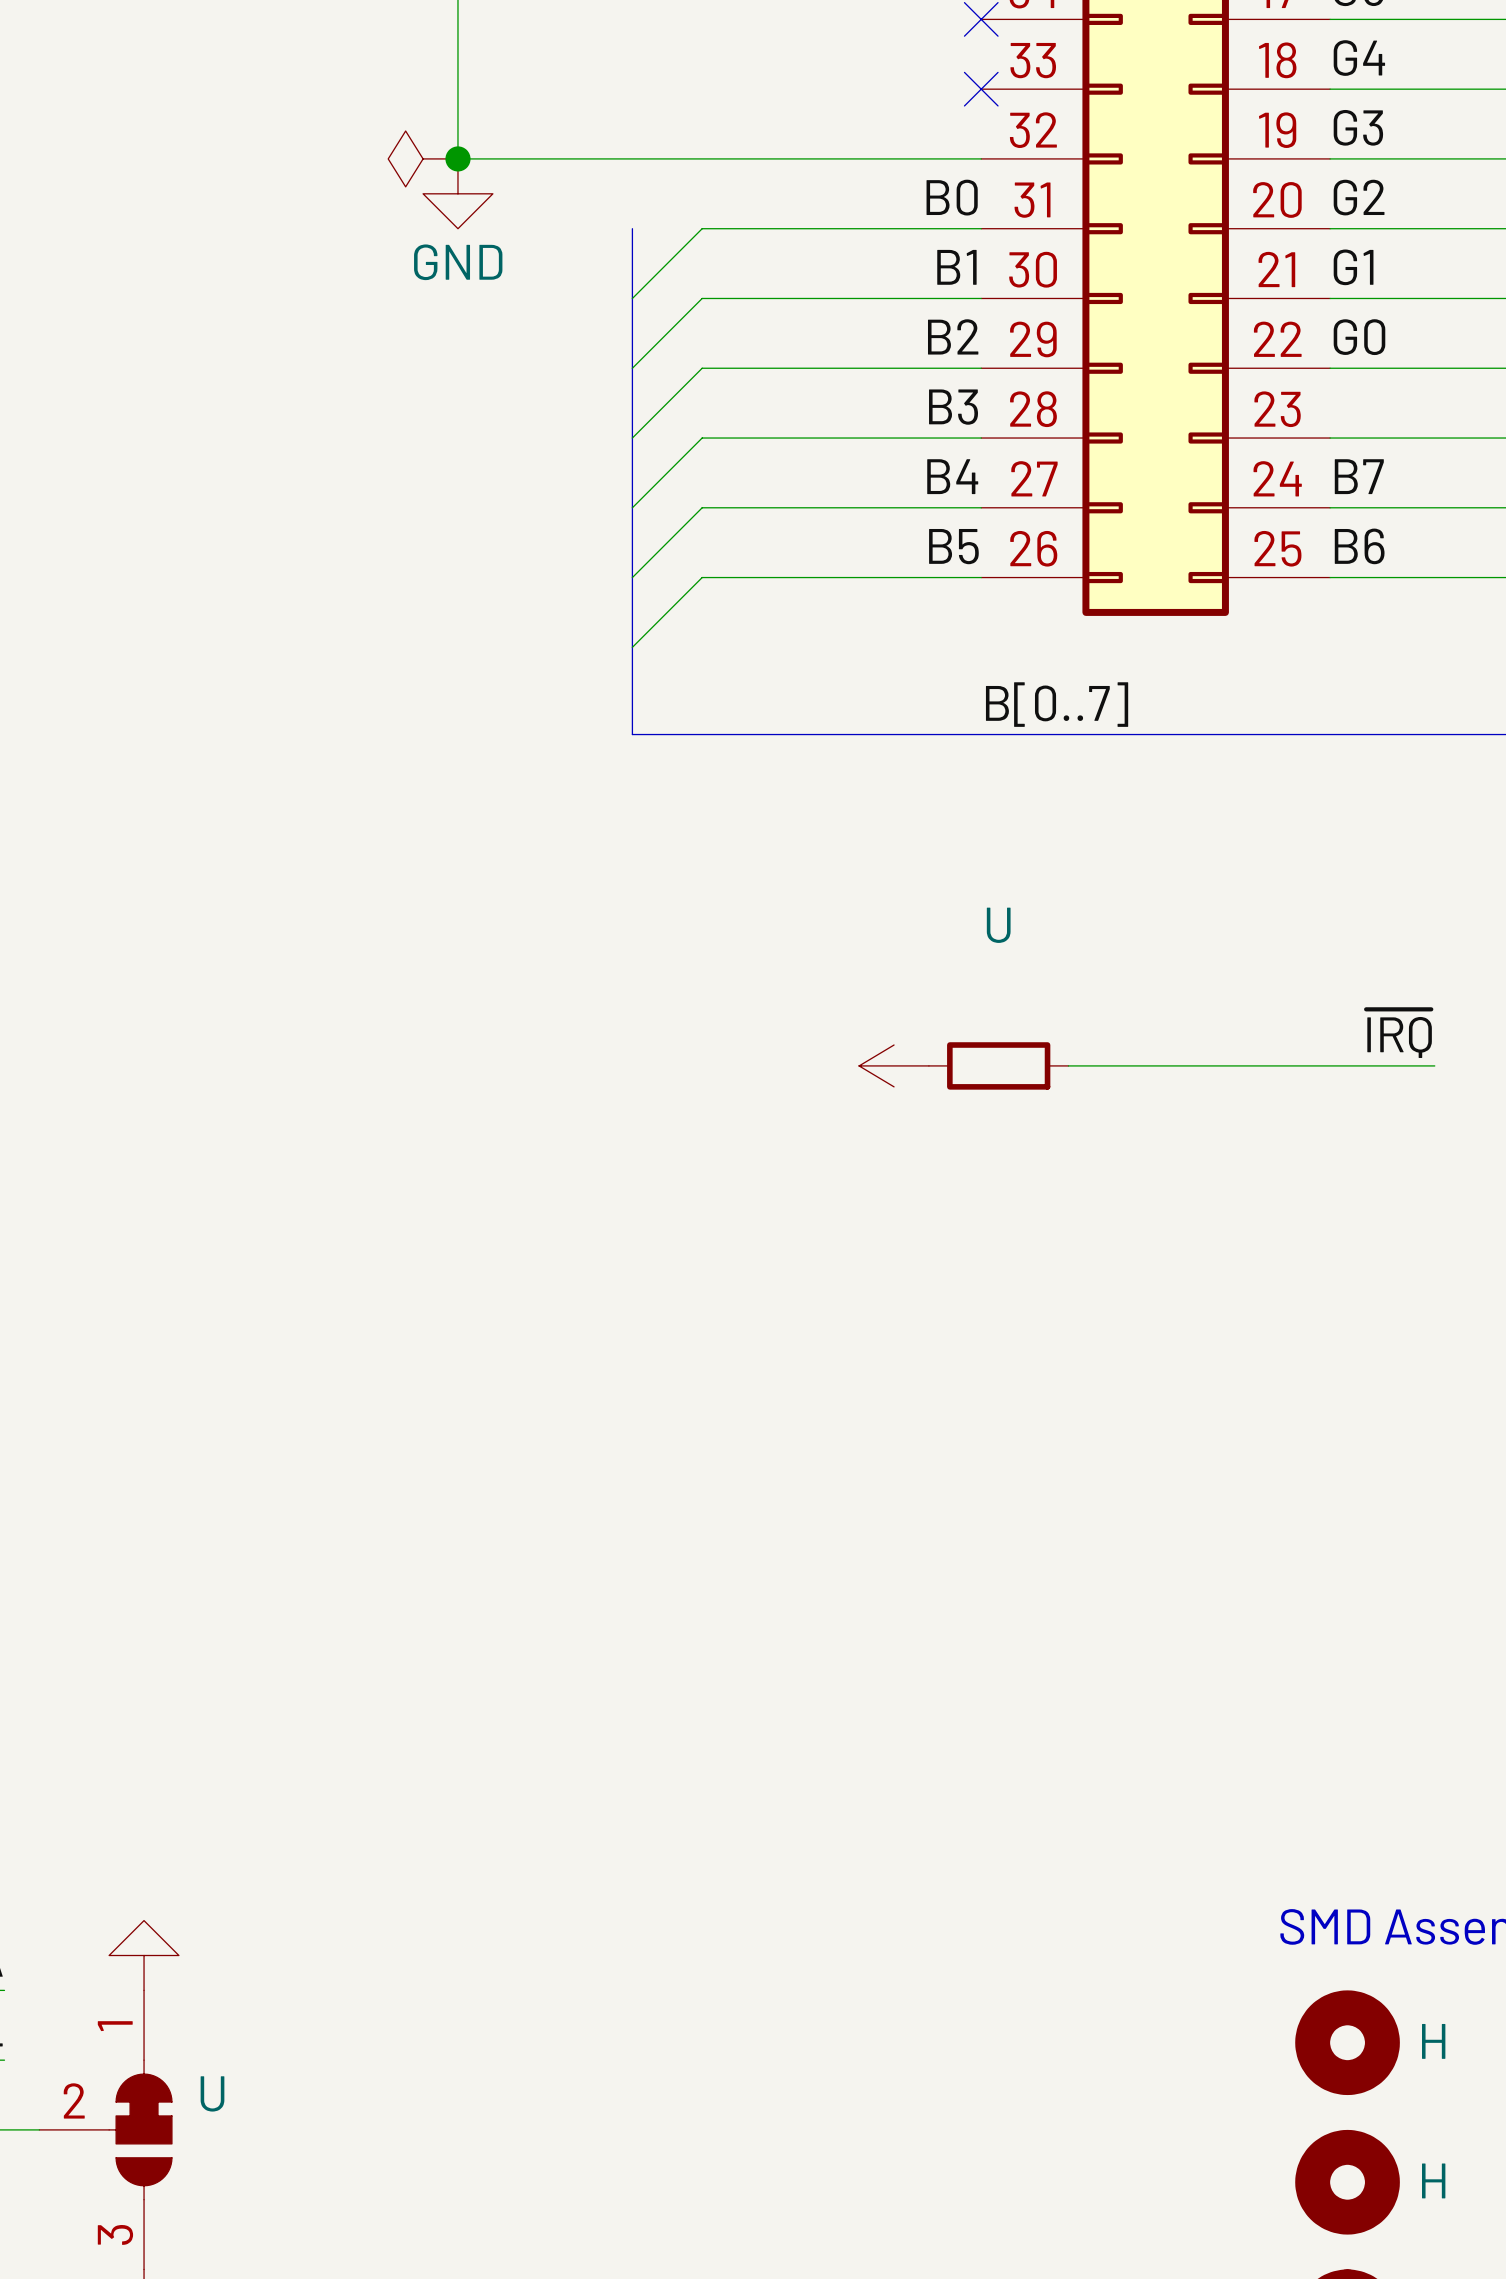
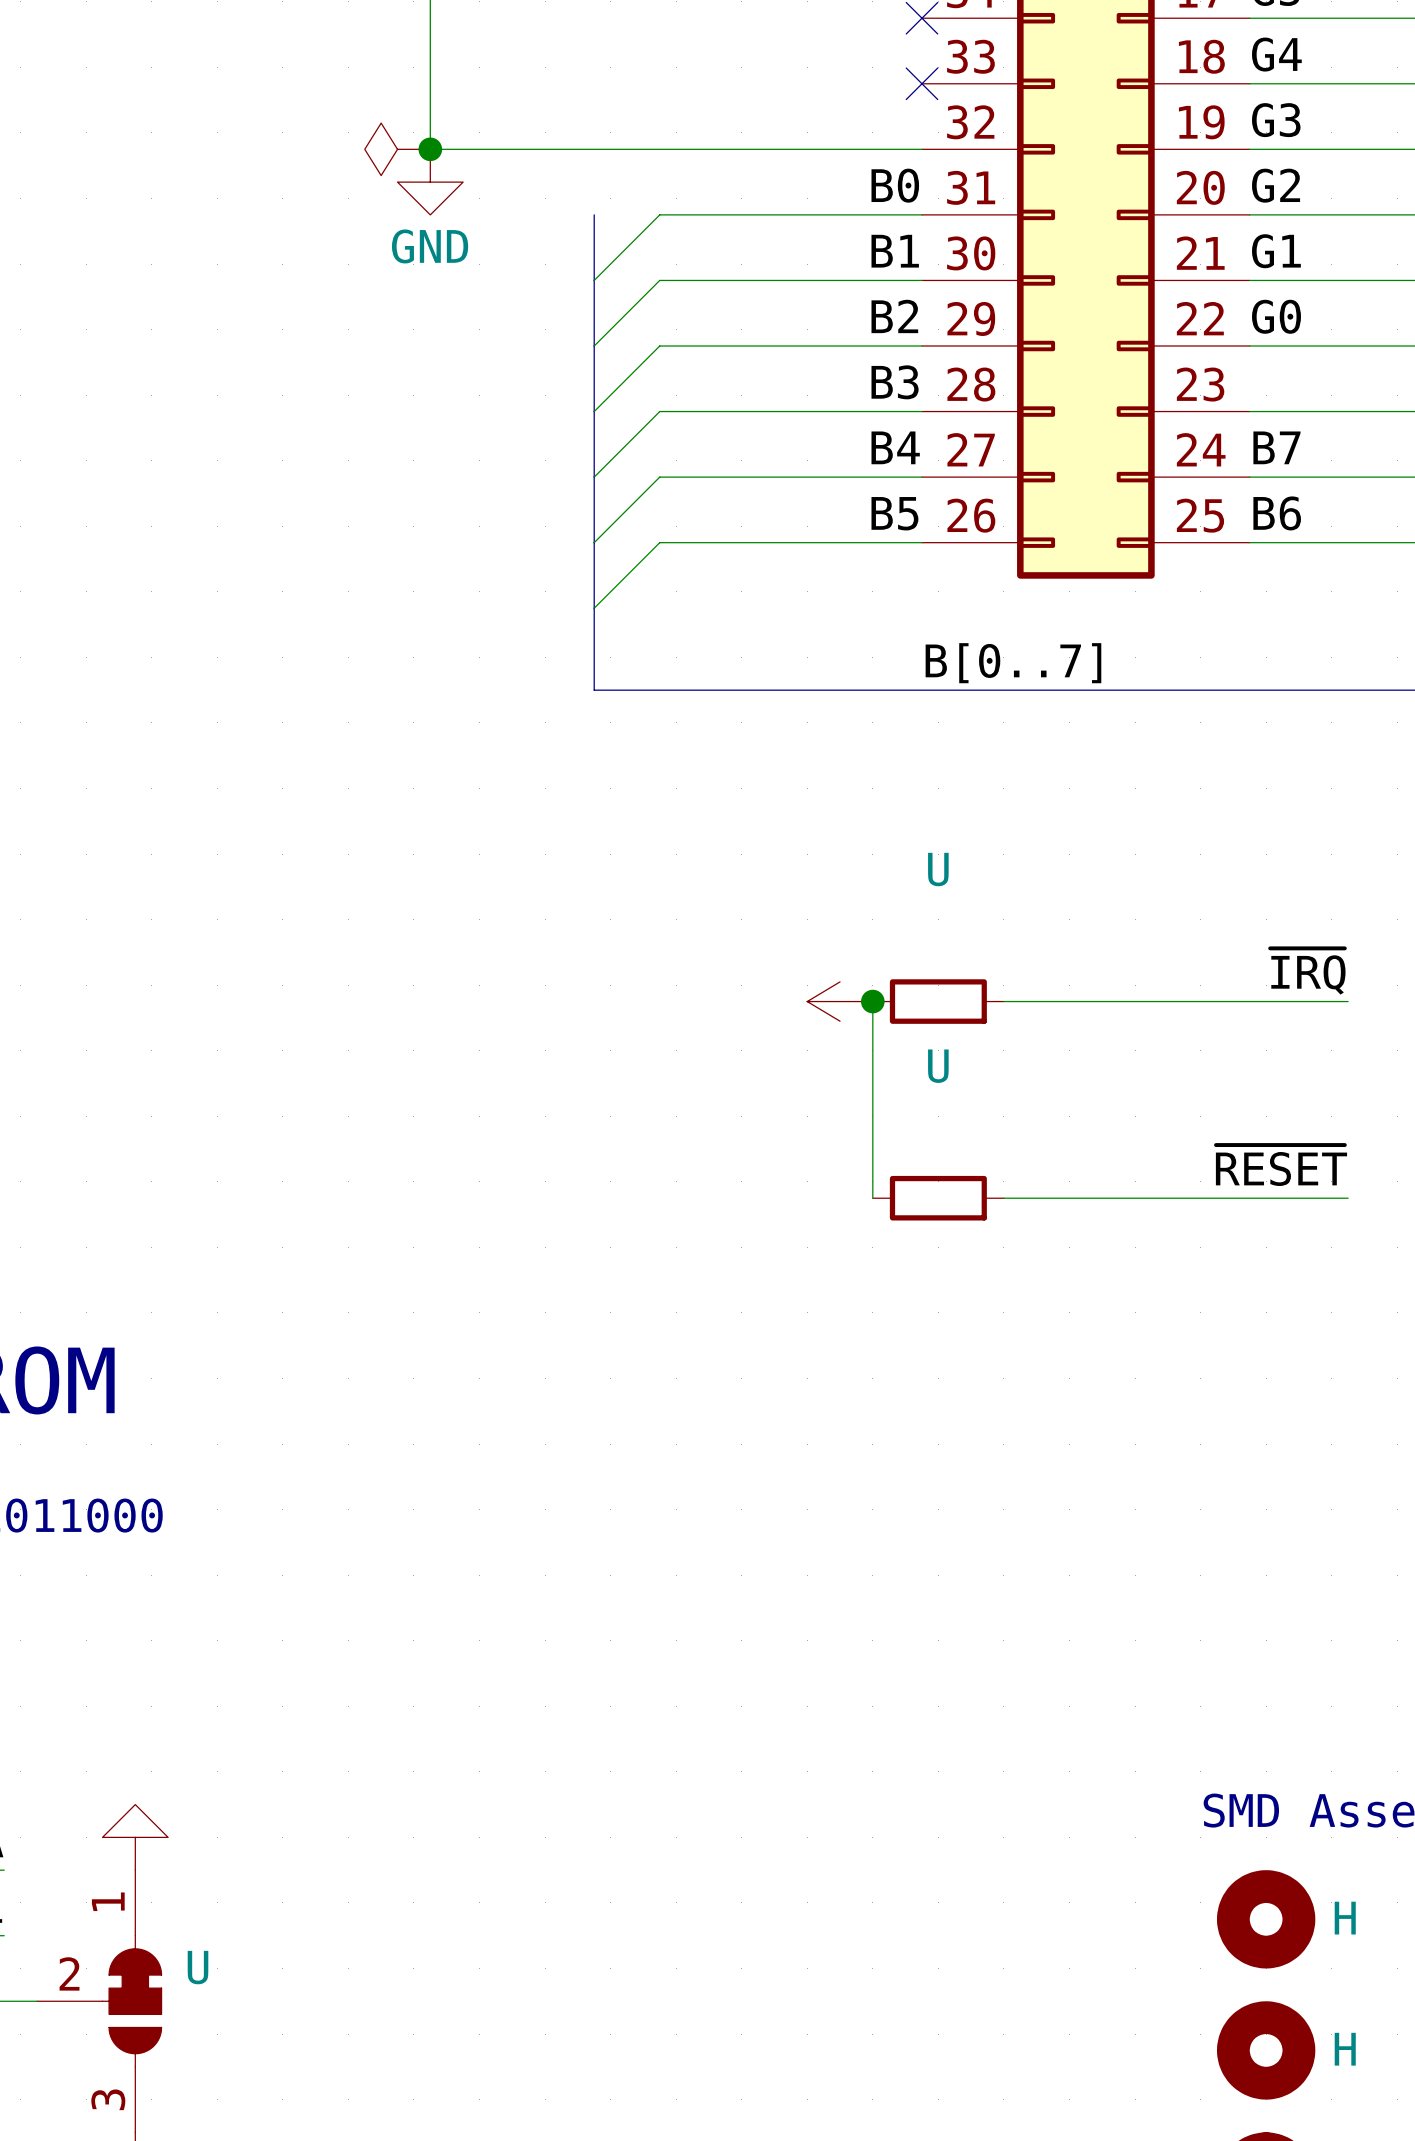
wire: none -> (872, 1001) (872, 1198)
junction: none -> (872, 1001)
label: none -> ~{RESET} (1281, 1165)
U: none -> (938, 1198)
wire: none -> (1003, 1198) (1348, 1198)

